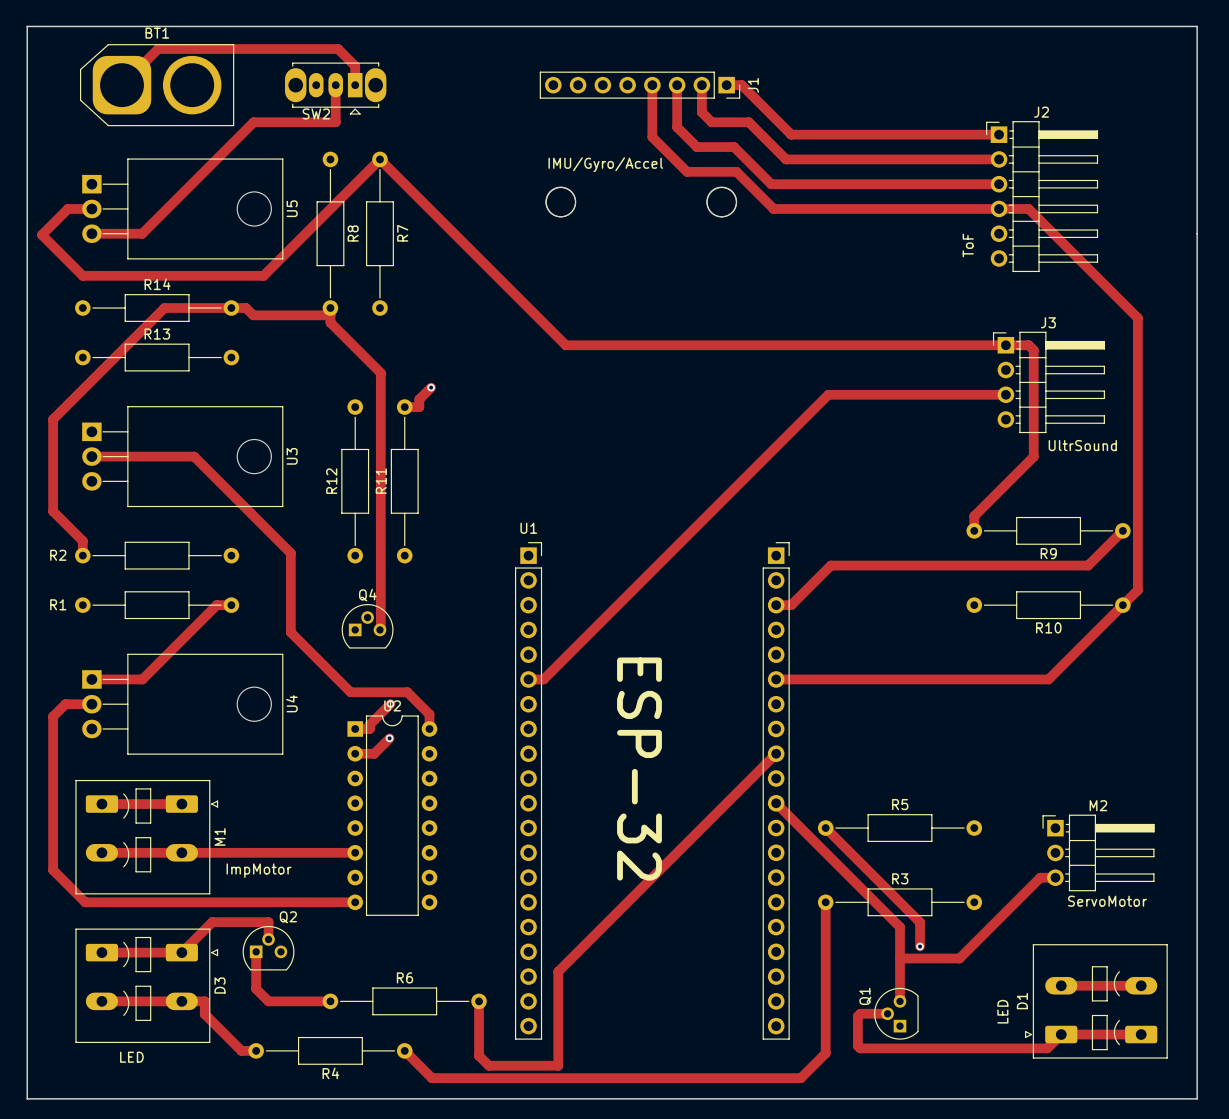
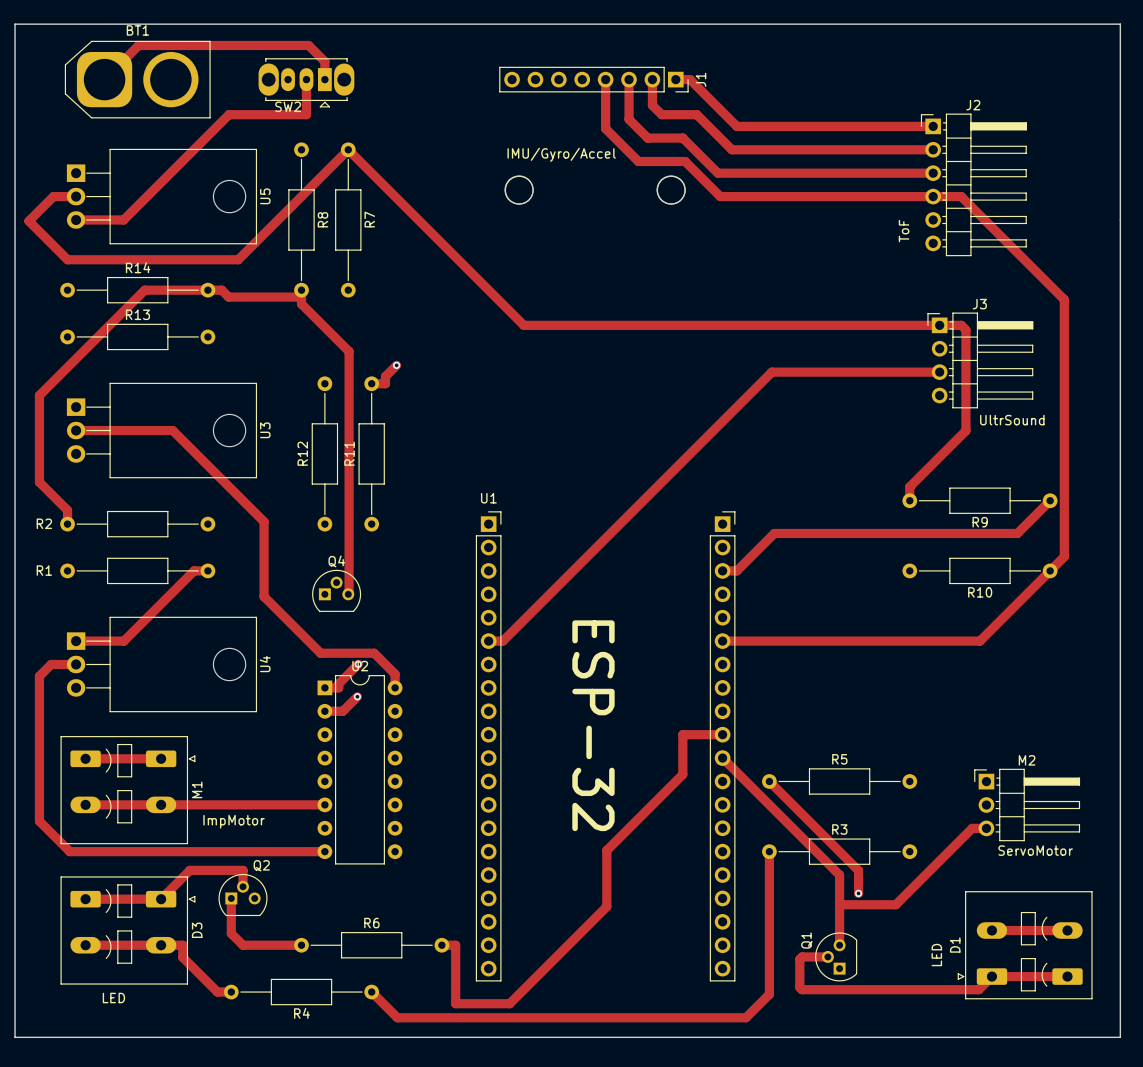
track: (776, 753) (558, 971) (558, 1065) (488, 1065) (479, 1055) (479, 1001) -> (722, 734) (682, 734) (682, 774) (606, 850) (606, 906) (509, 1003) (455, 1003) (455, 945) (441, 945)

